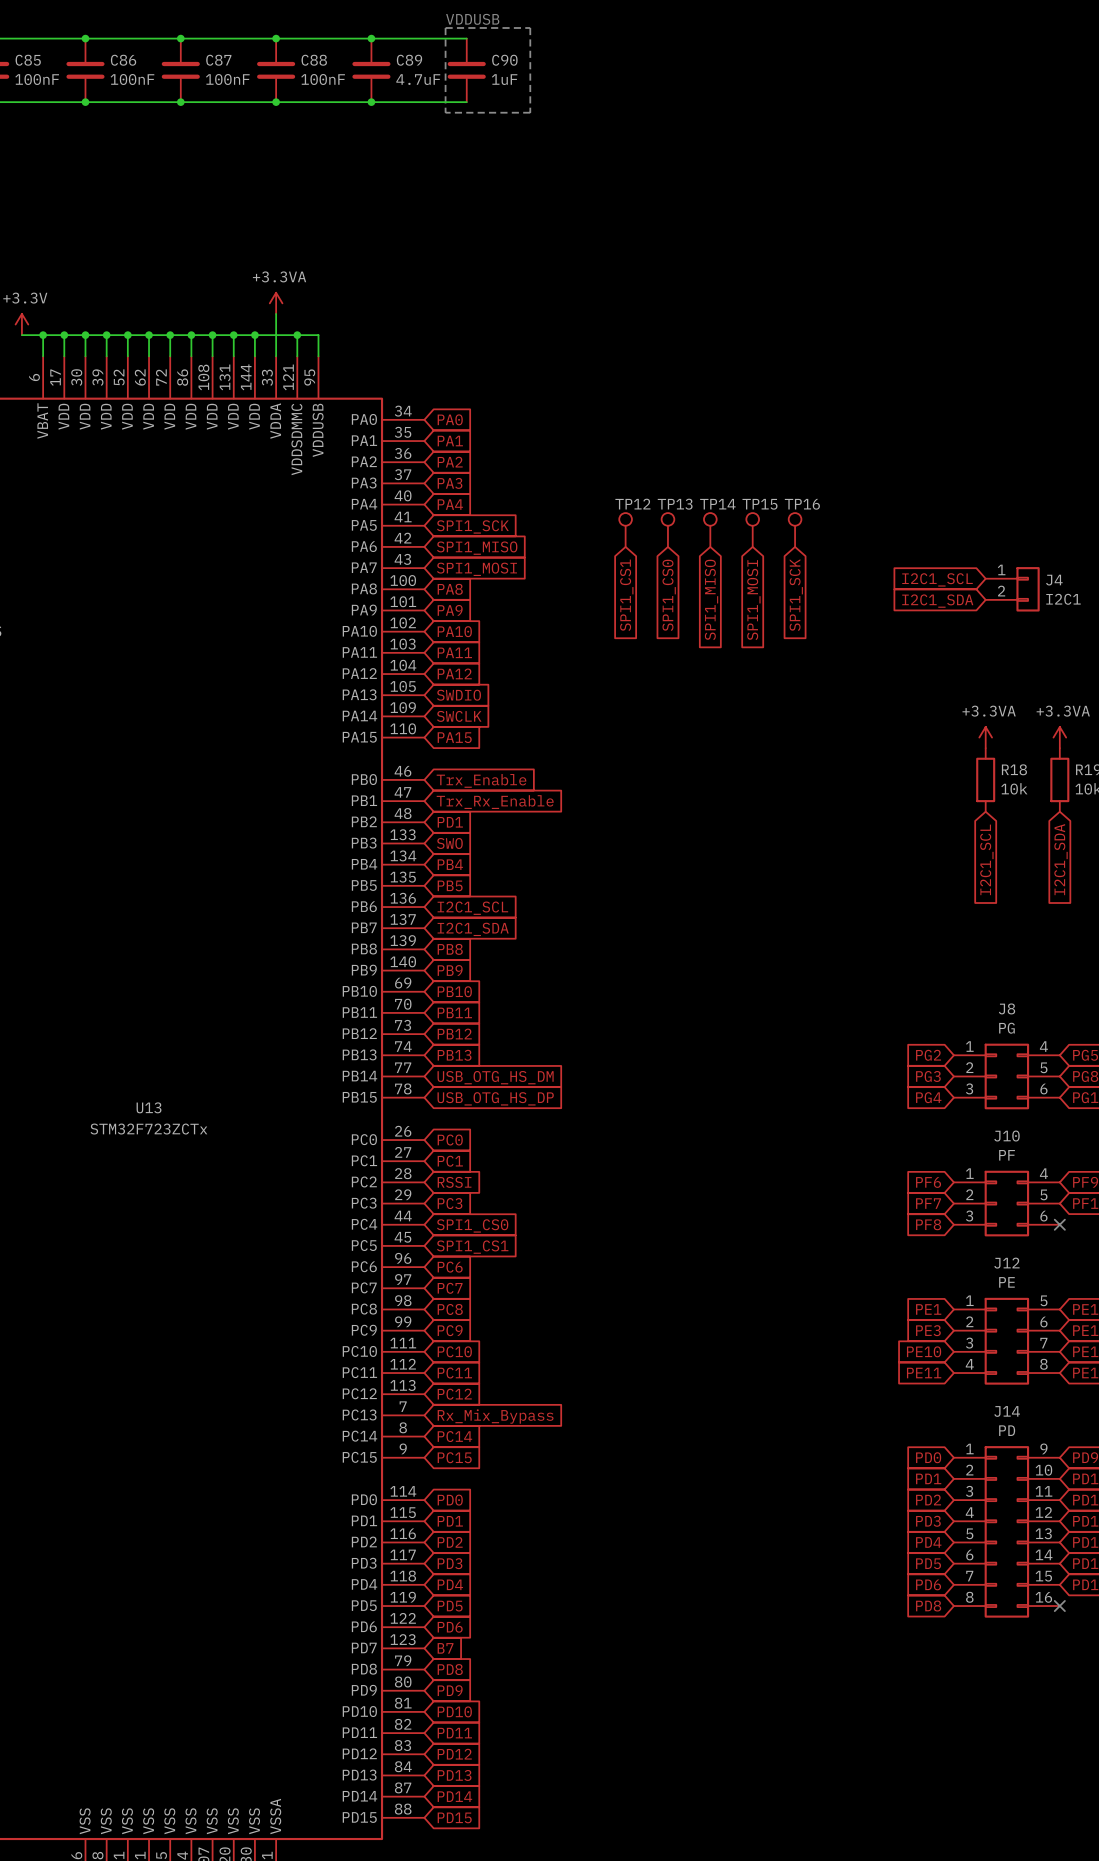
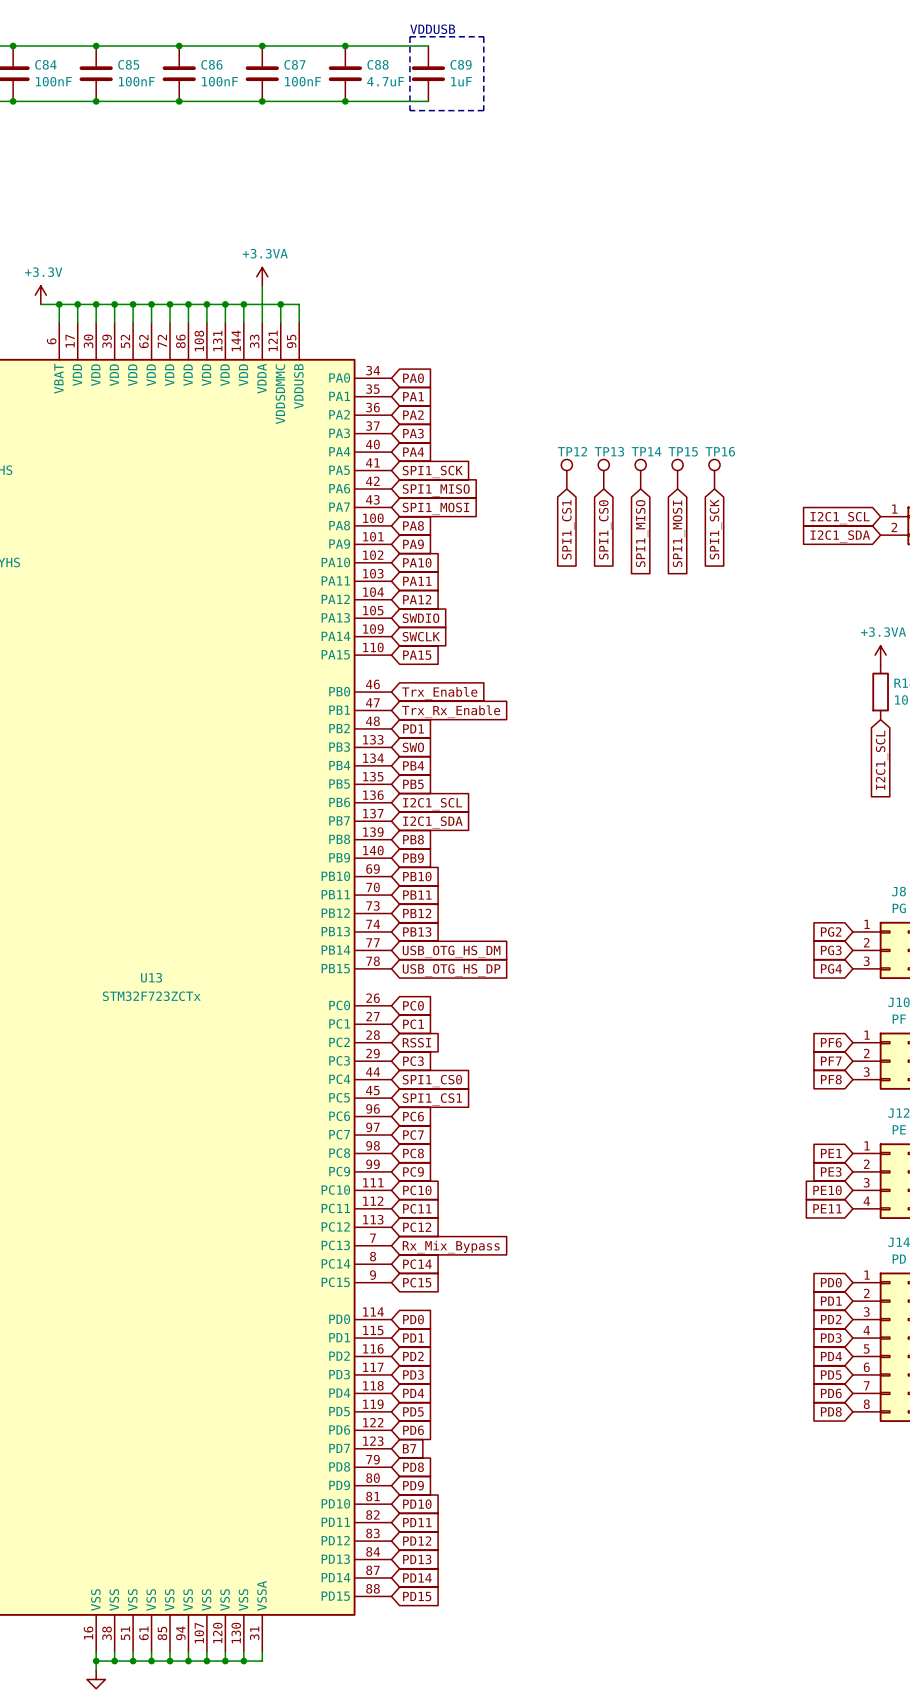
C85 name: C85 (28, 60) -> C84 (45, 64)
C86 name: C86 (123, 60) -> C85 (128, 64)
C87 name: C87 (218, 60) -> C86 (211, 64)
C88 name: C88 (314, 60) -> C87 (294, 64)
C89 name: C89 (409, 60) -> C88 (378, 64)
C90 name: C90 (504, 60) -> C89 (461, 64)

